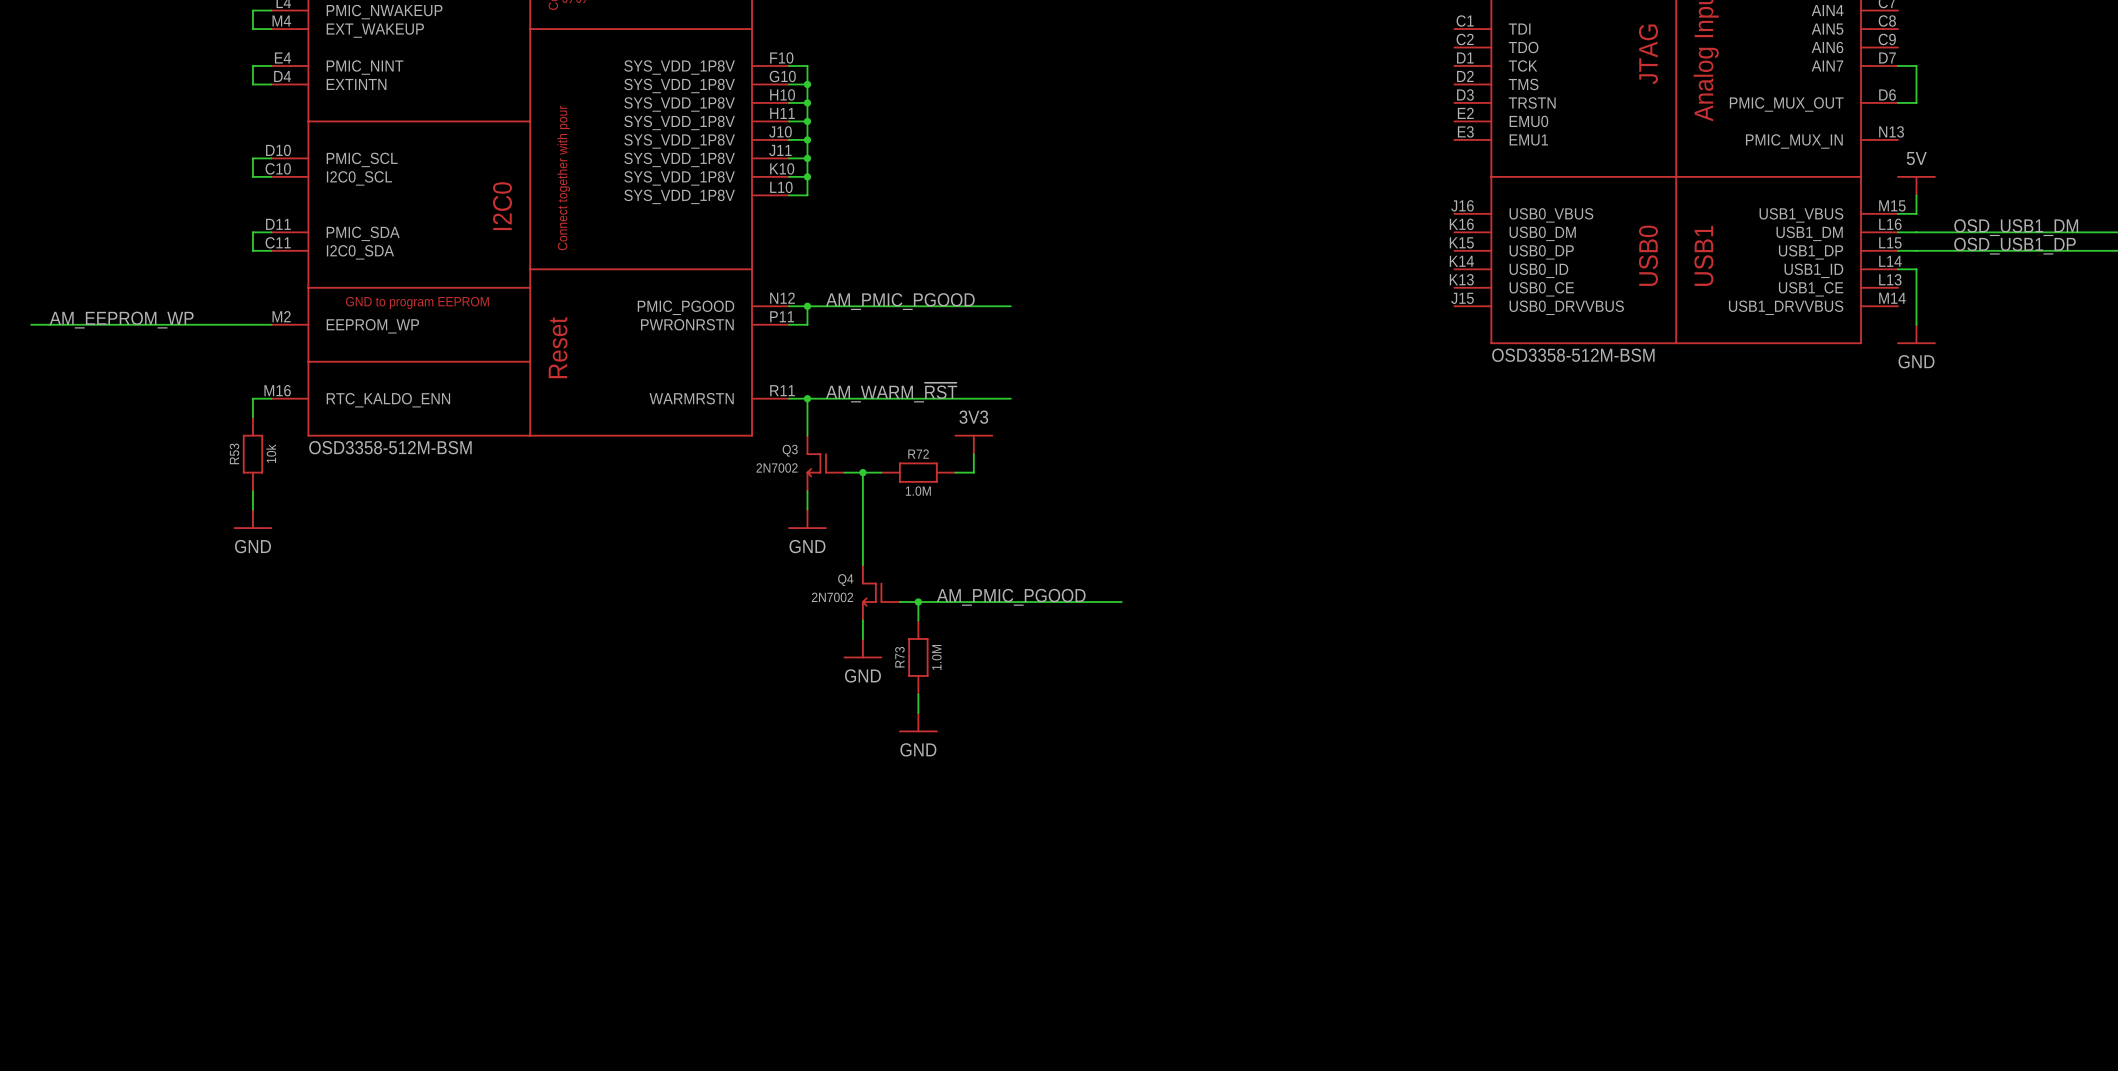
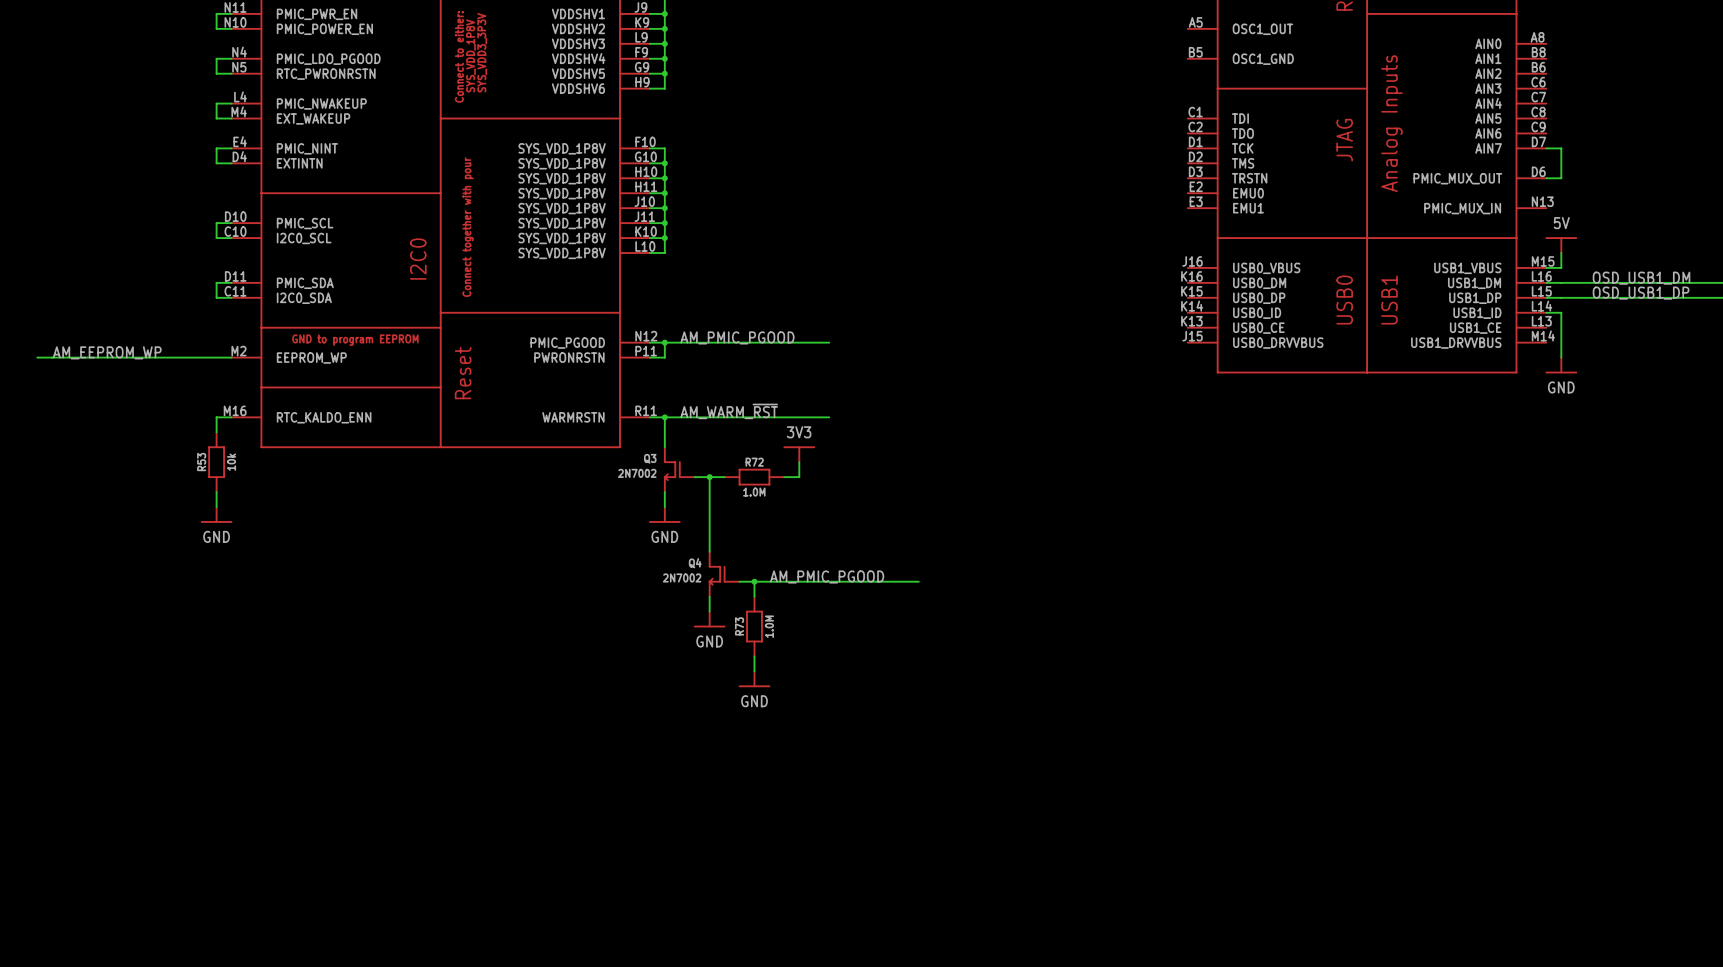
part value: OSD3358-512M-BSM (1573, 355) -> none
part value: OSD3358-512M-BSM (390, 447) -> none

